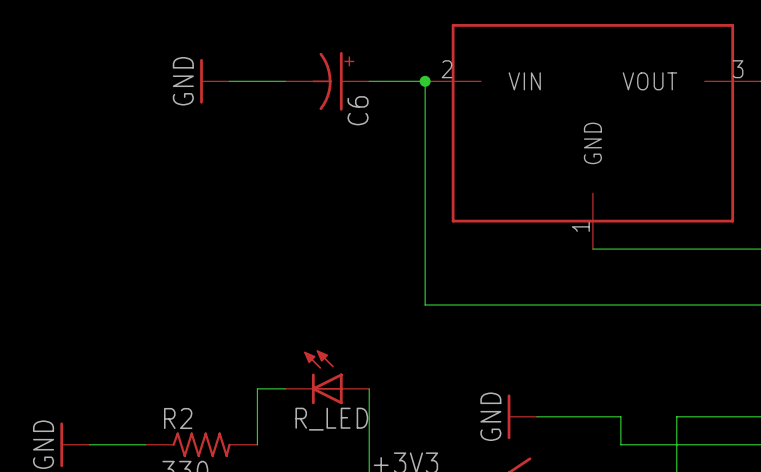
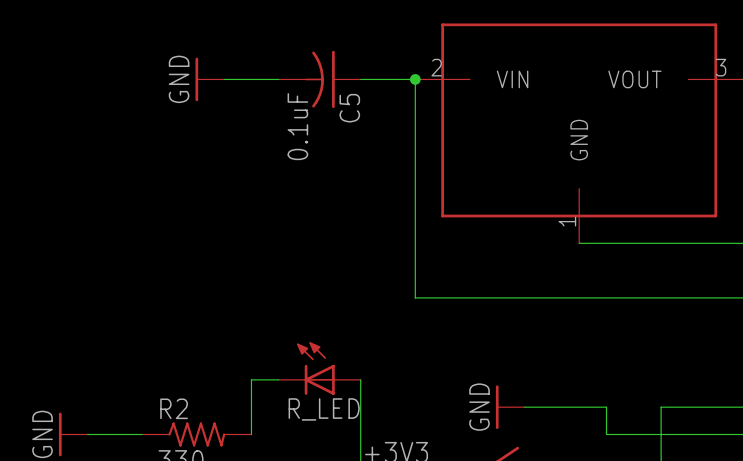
C6: (327, 81) -> none
C5: none -> 0.1uF (319, 79)

